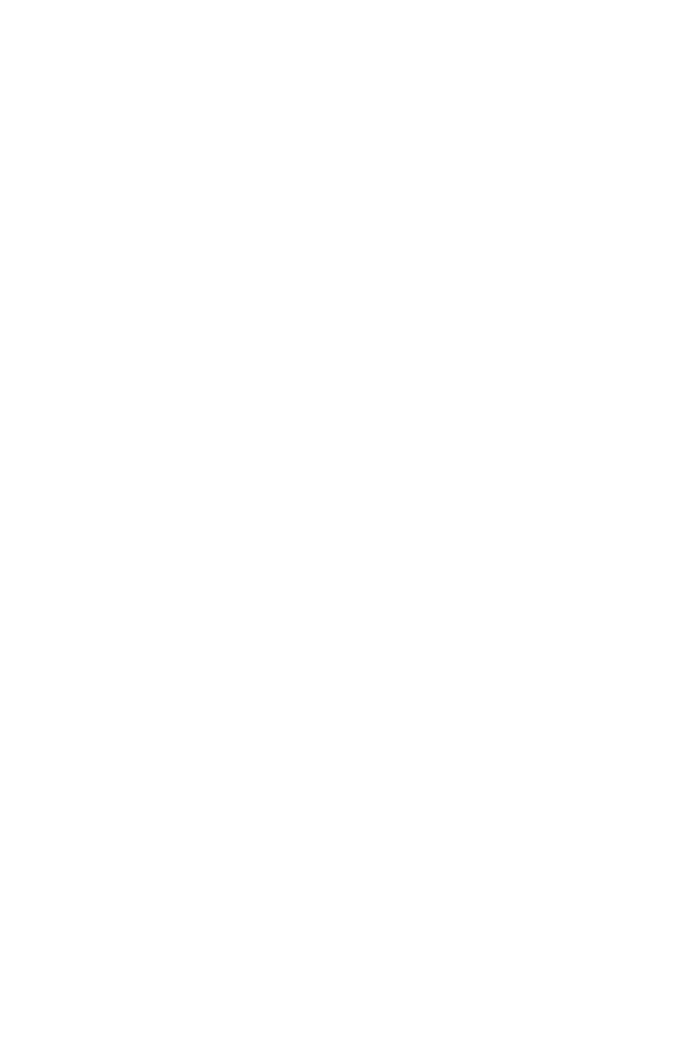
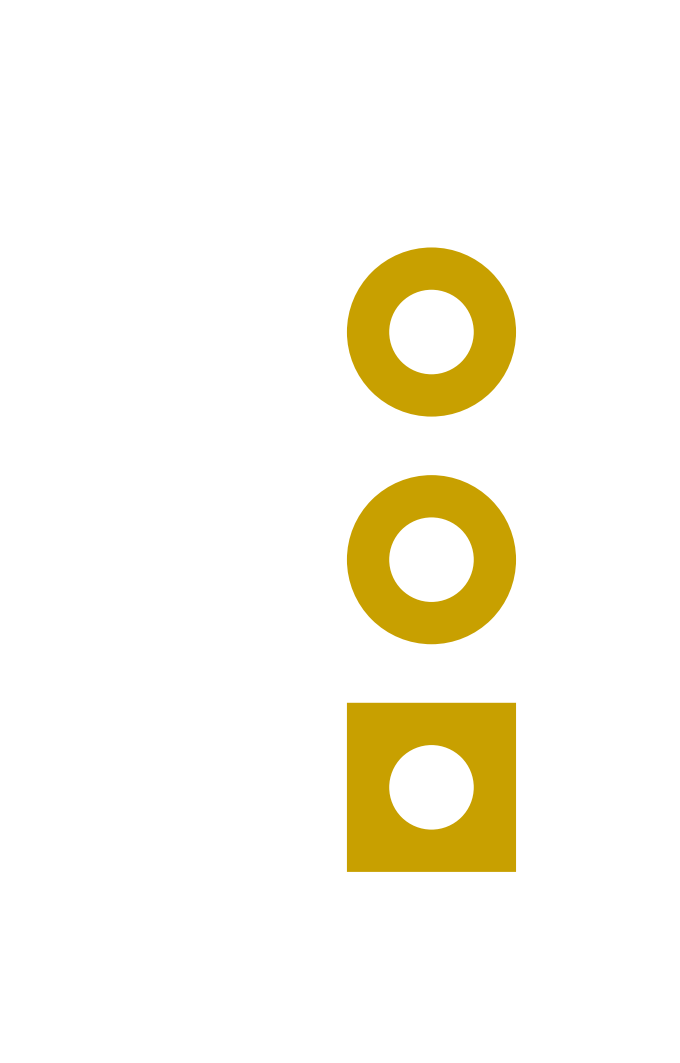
part: none -> (431, 559)

